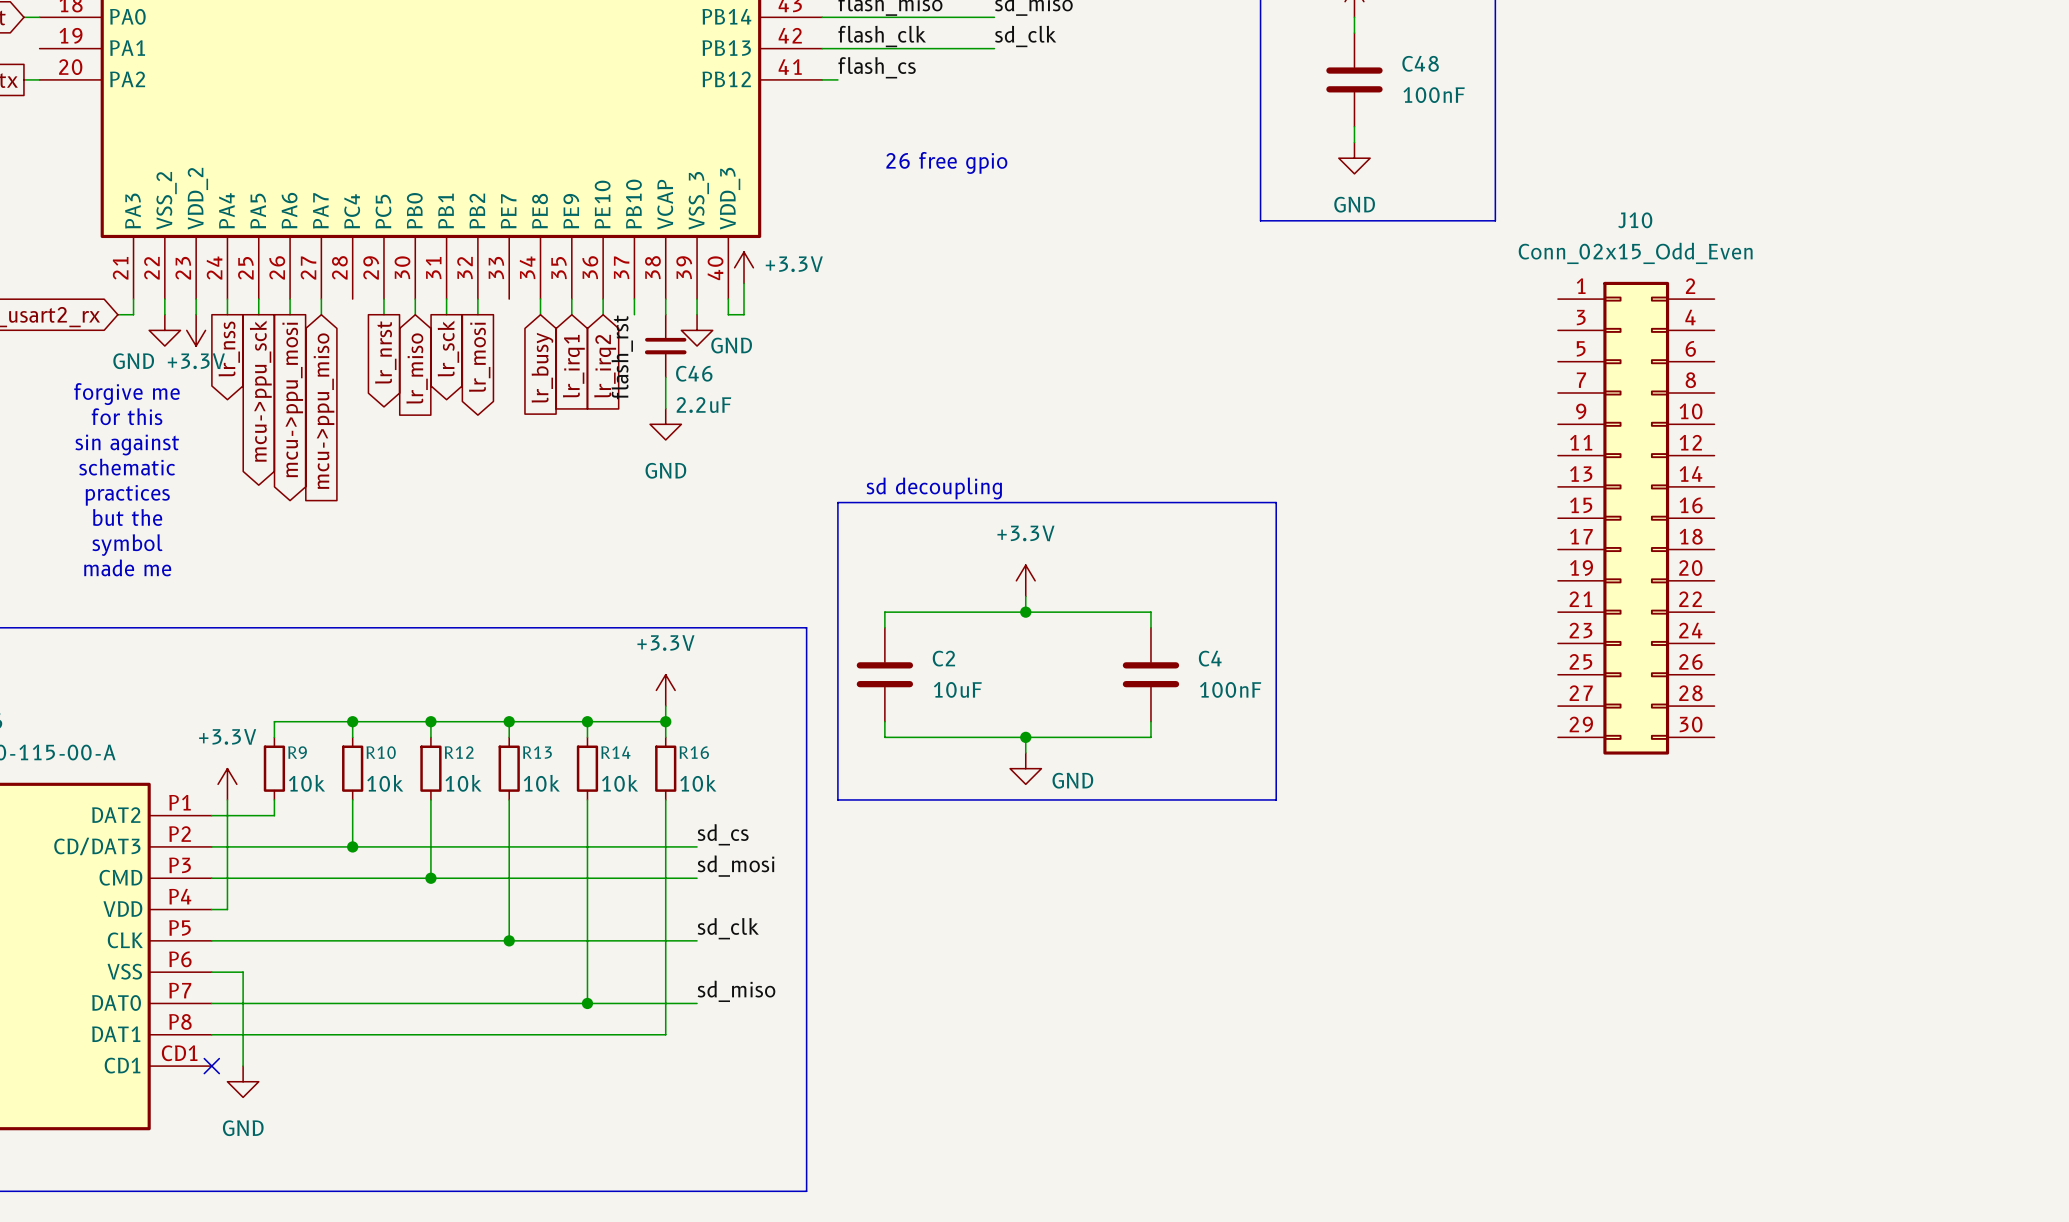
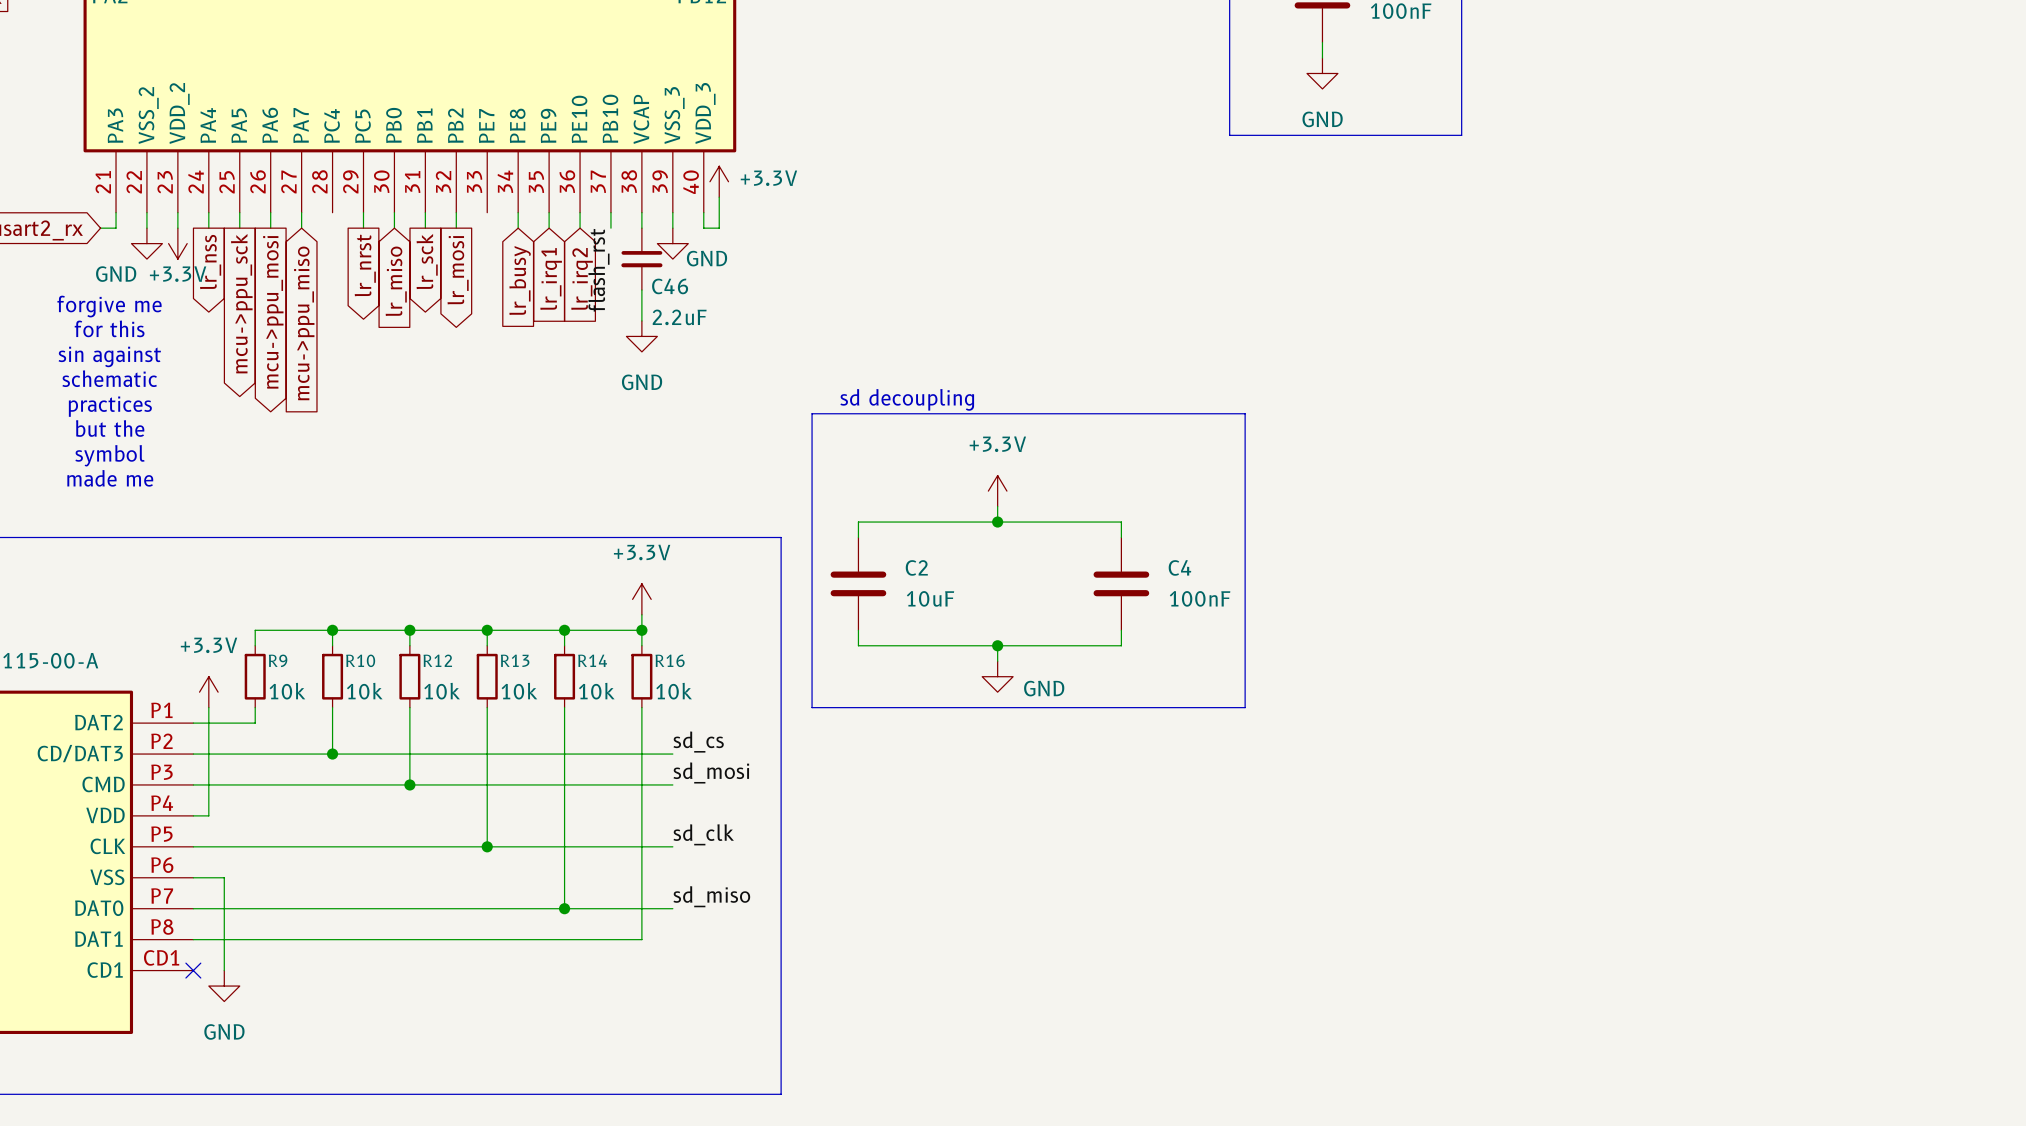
text: 26 free gpio (946, 162) -> none
J10: Conn_02x15_Odd_Even (1636, 518) -> none

